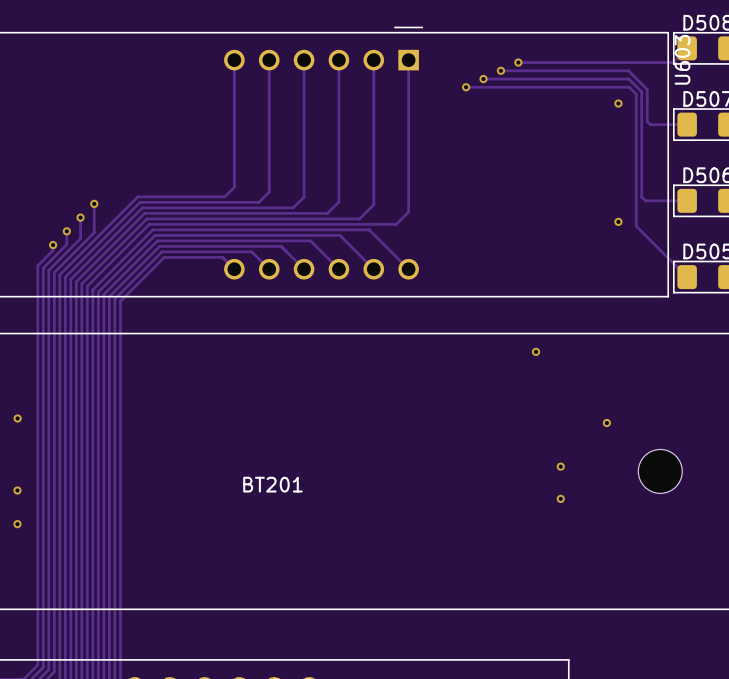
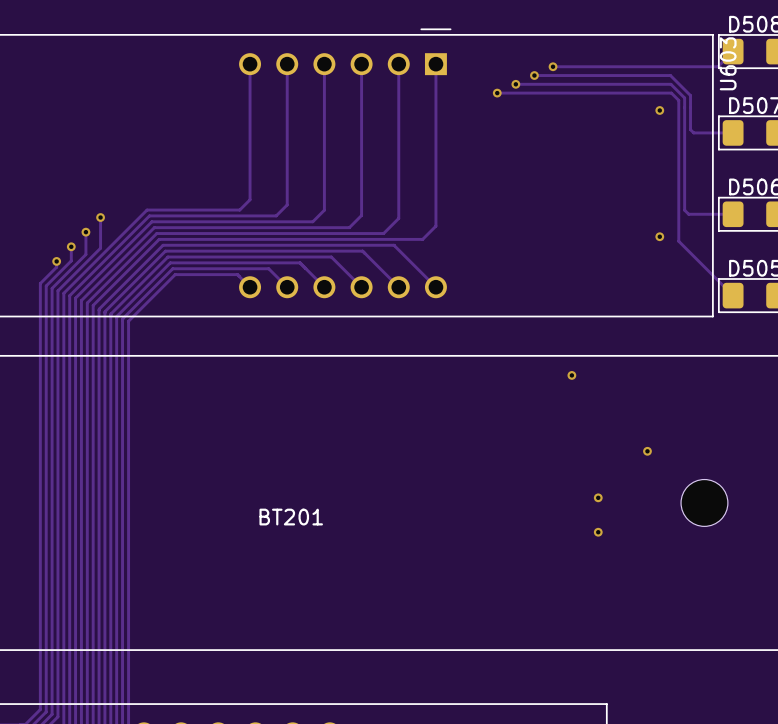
via: (17, 418) -> none
via: (17, 490) -> none
via: (17, 524) -> none

